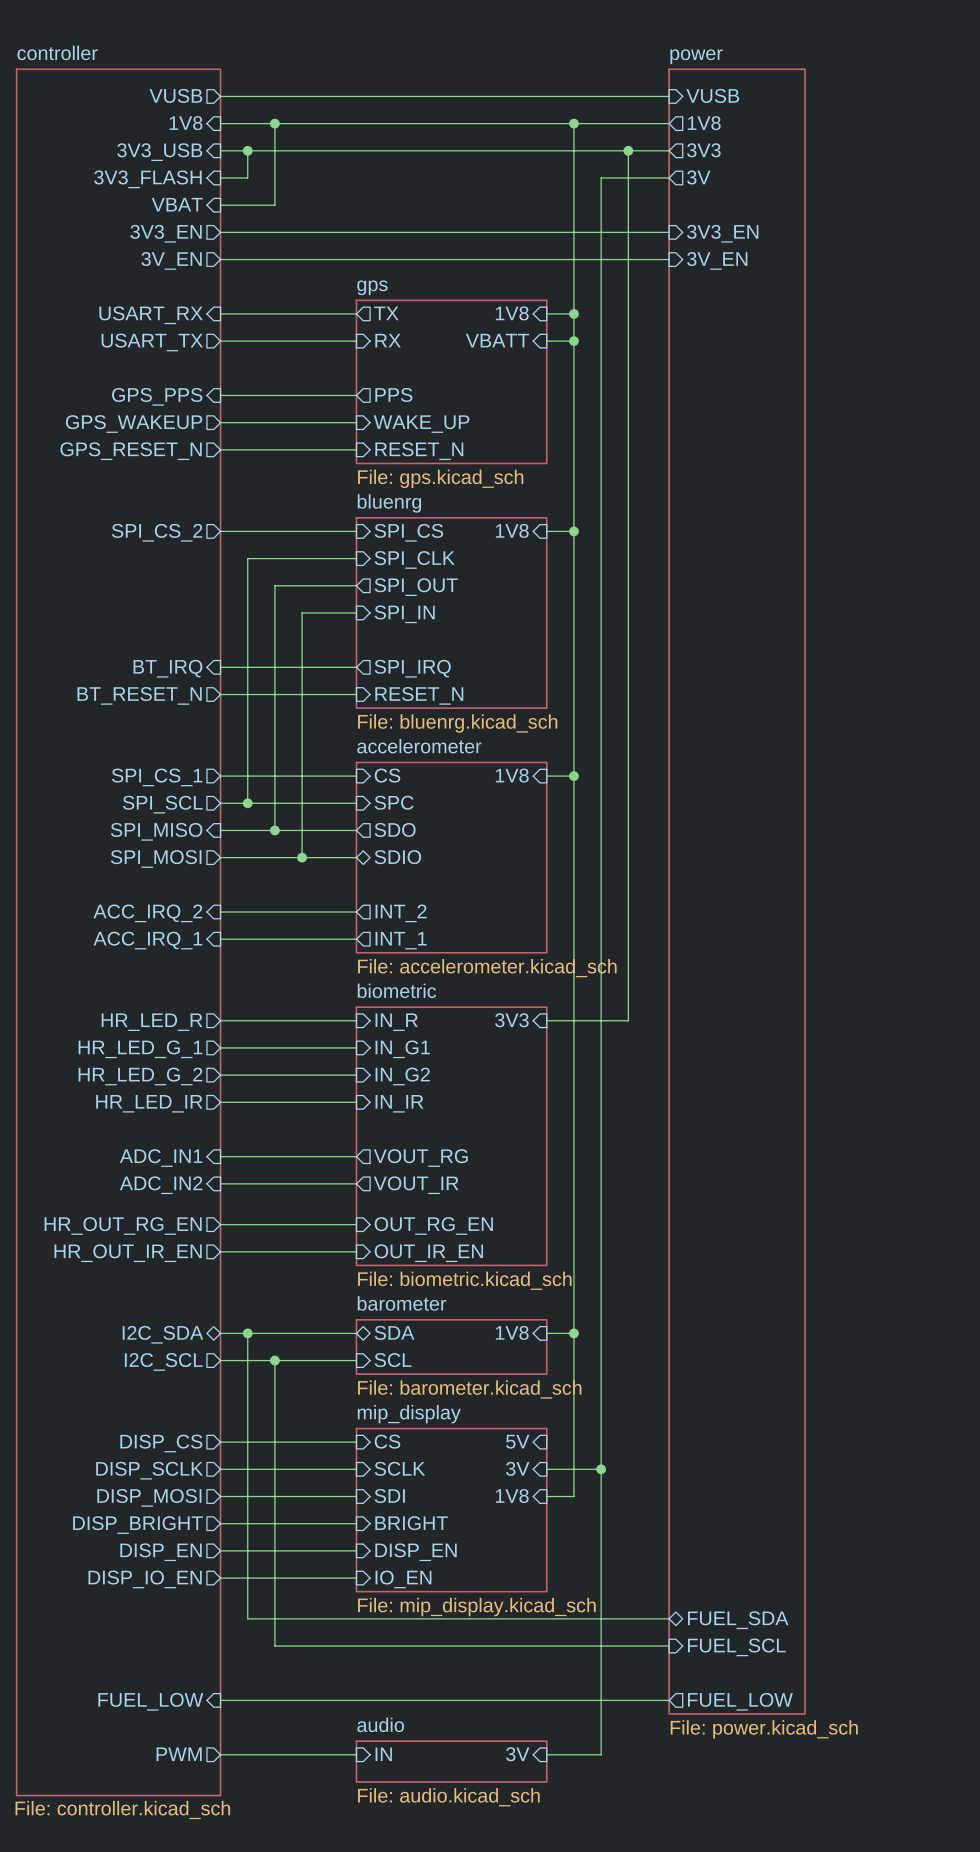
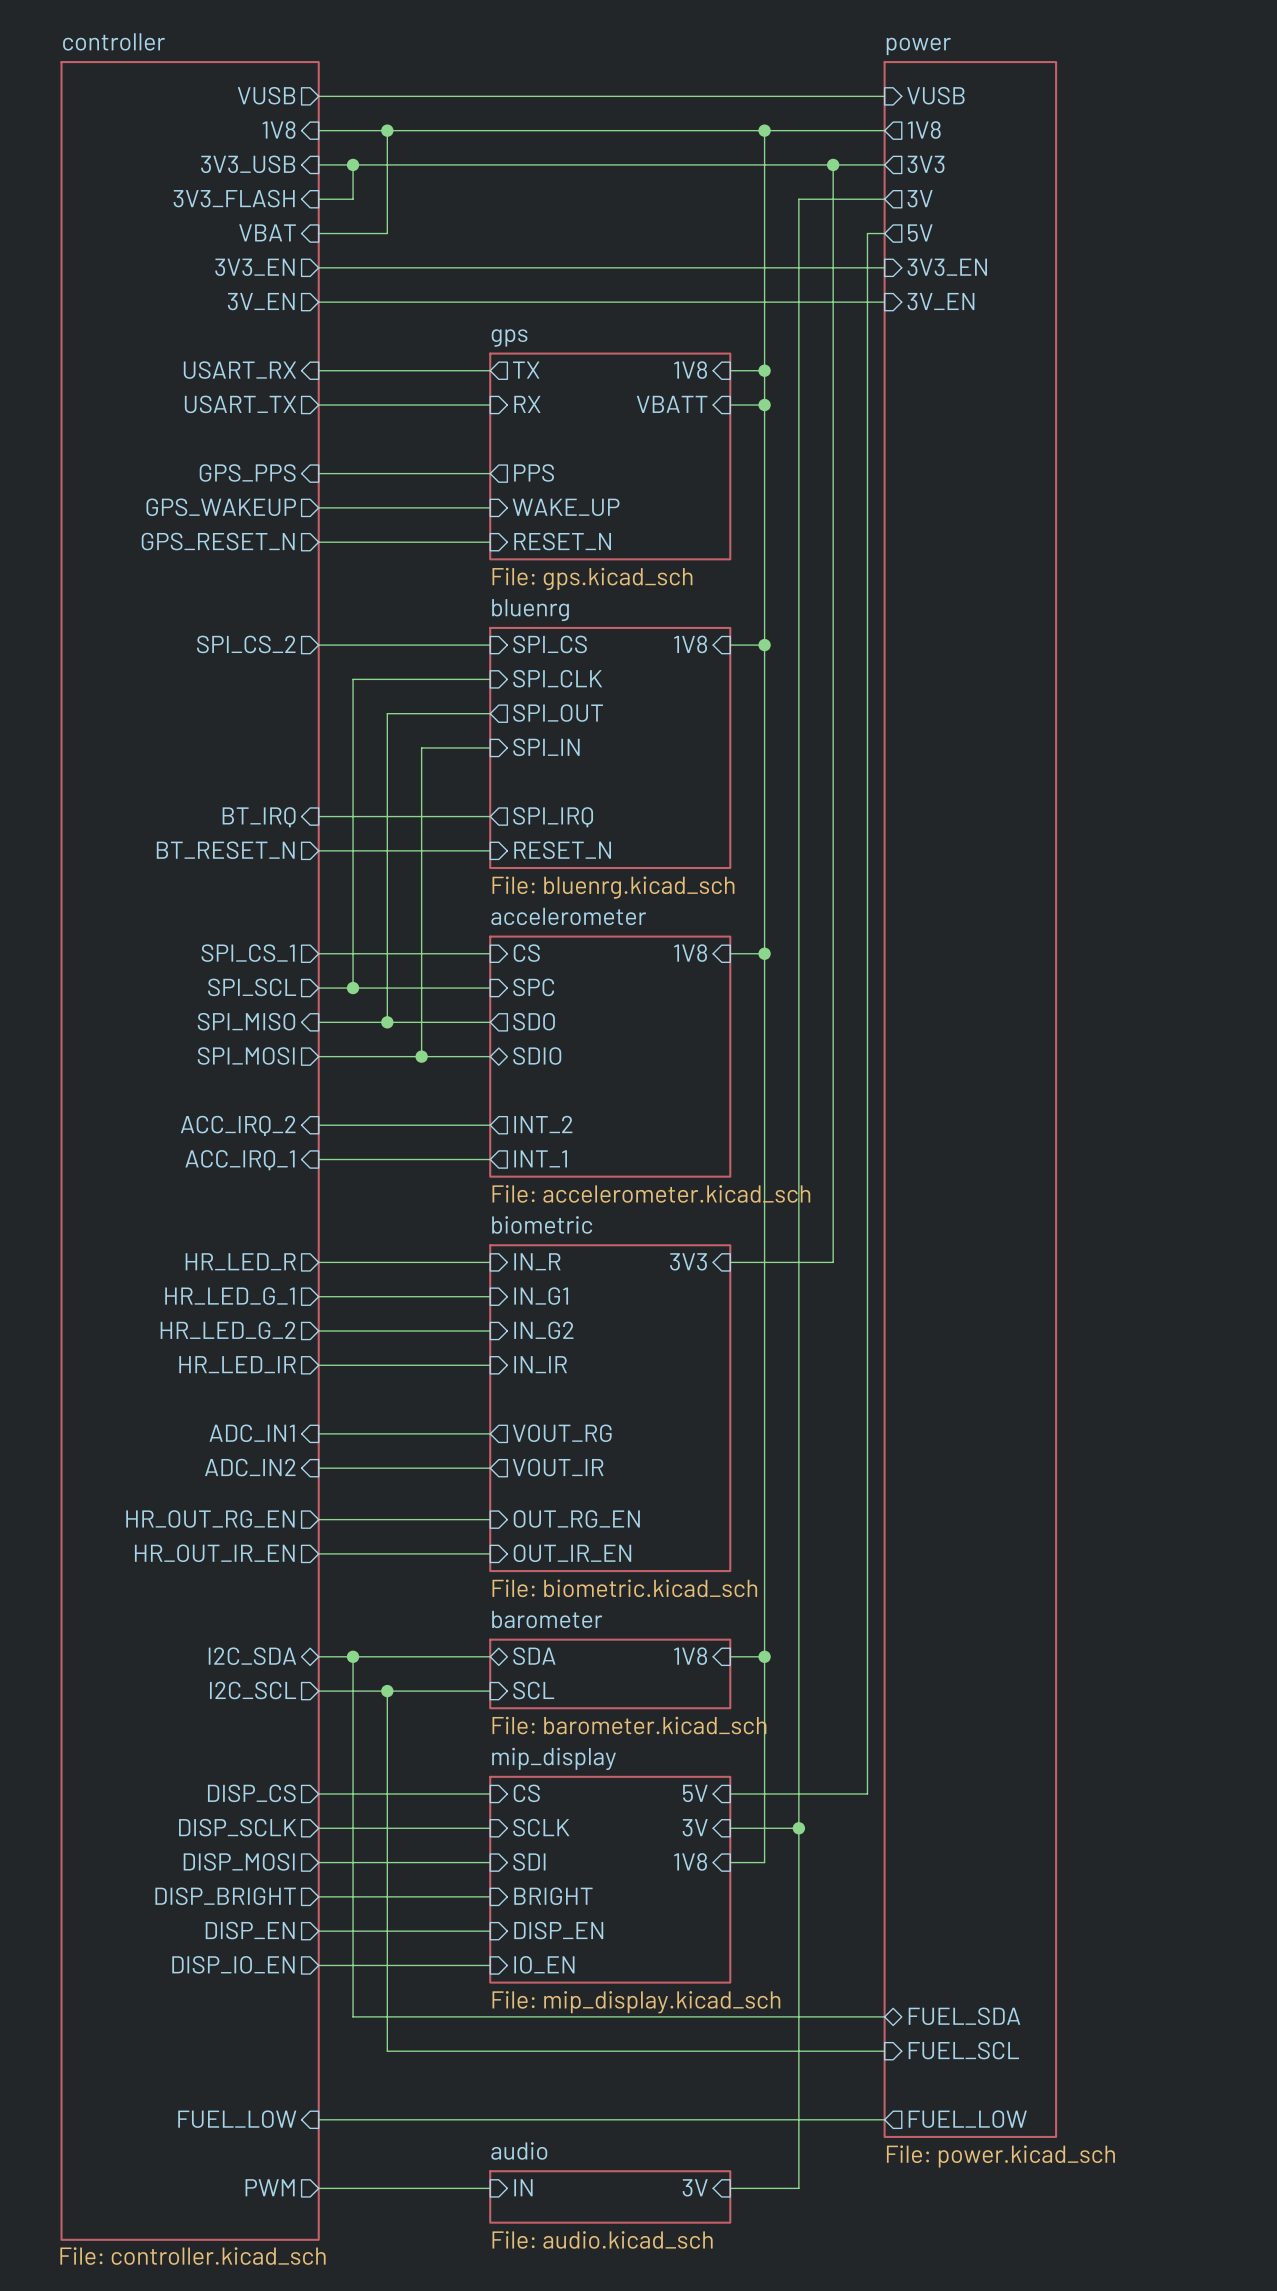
sheet pin: none -> 5V (920, 232)
wire: none -> (884, 233) (867, 233) (867, 1793) (730, 1793)

